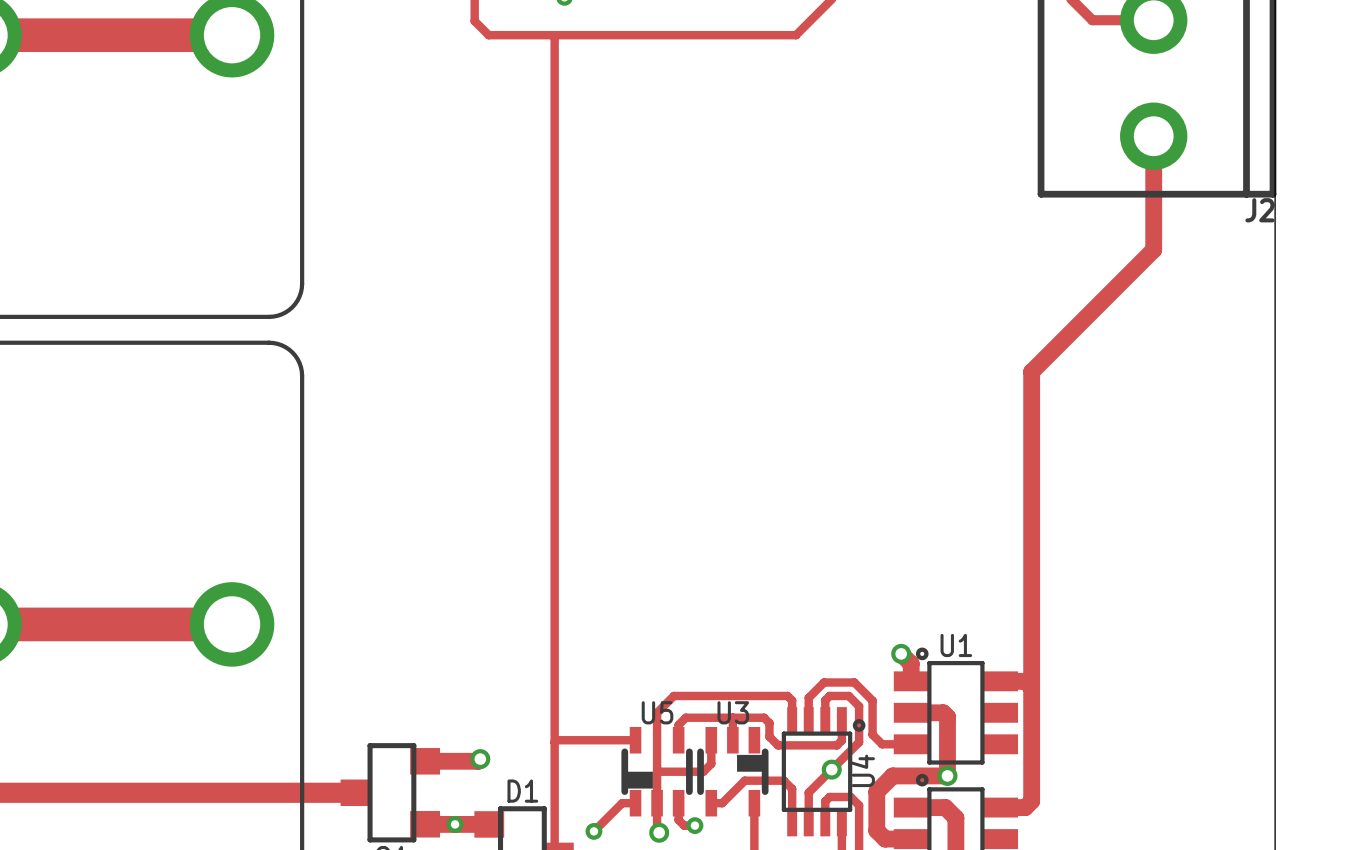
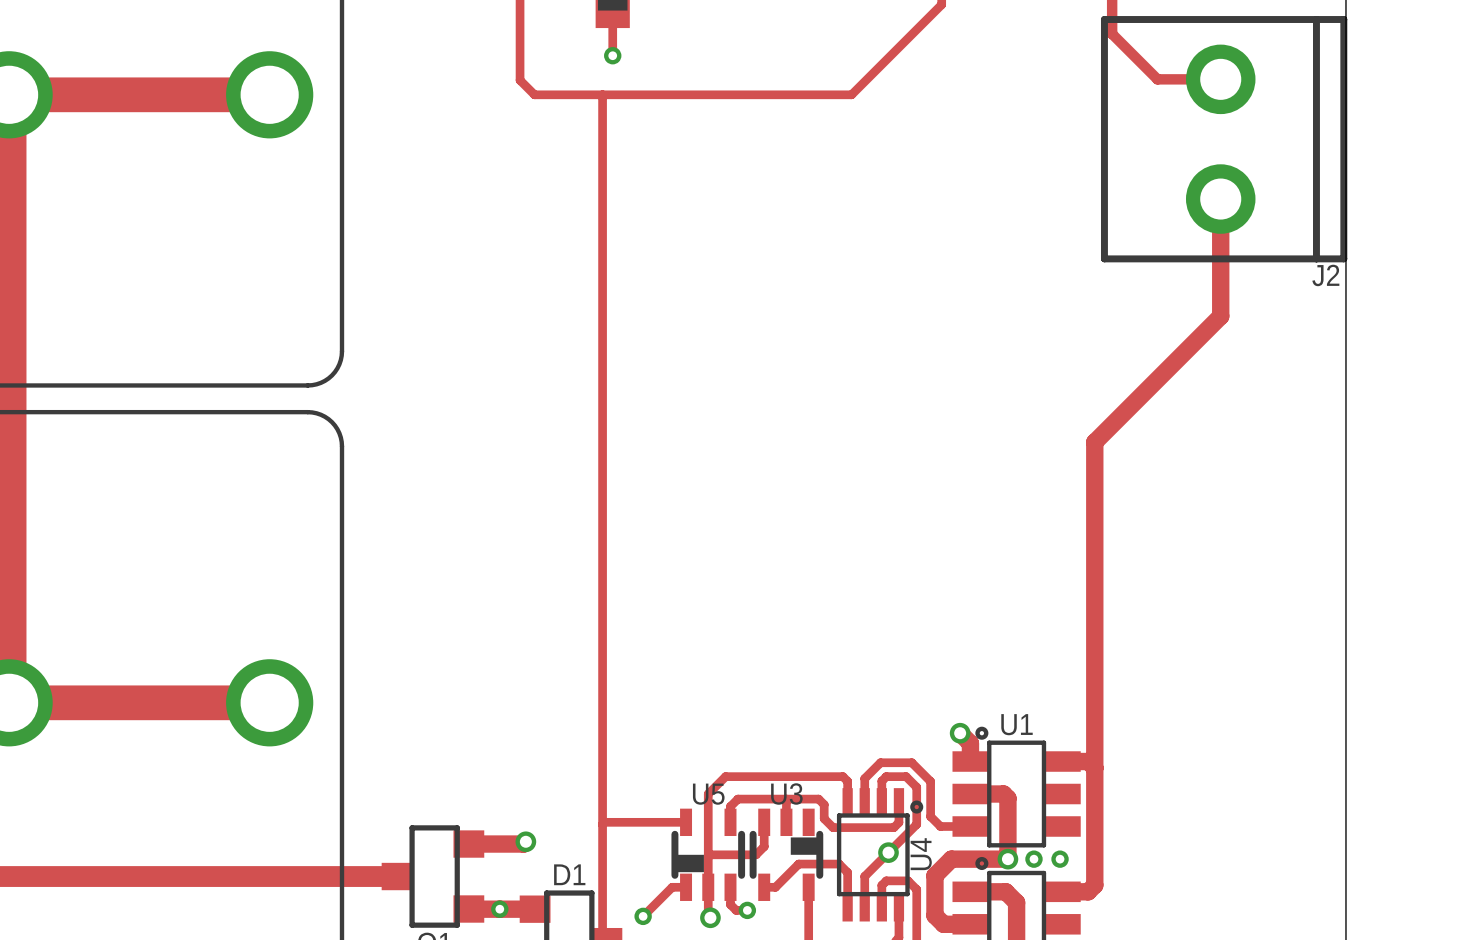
via: none -> (1033, 859)
via: none -> (1060, 859)

